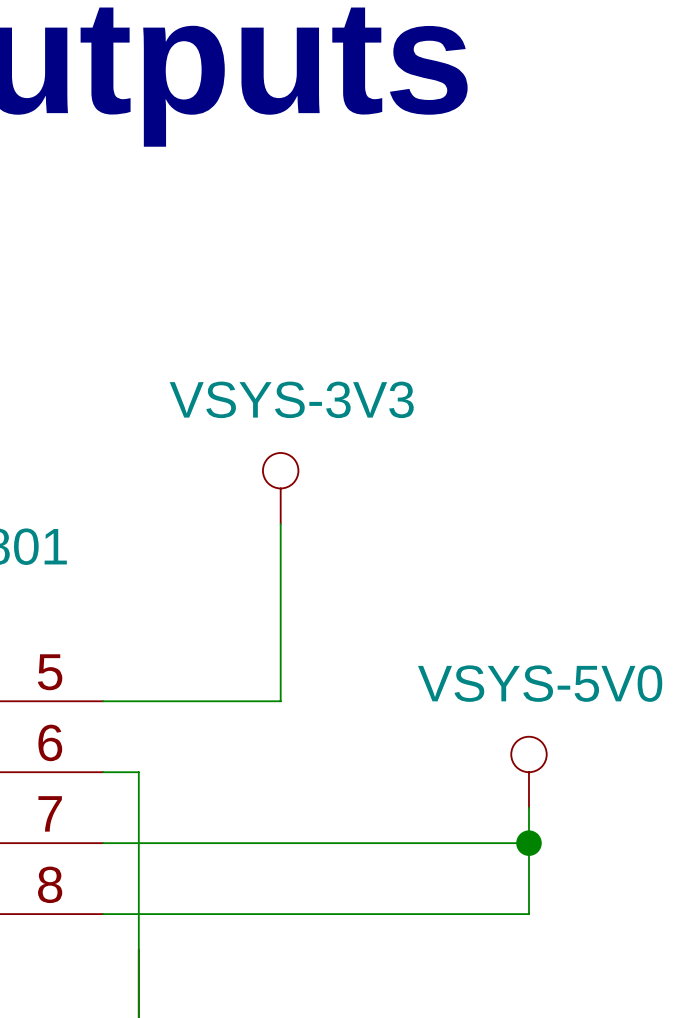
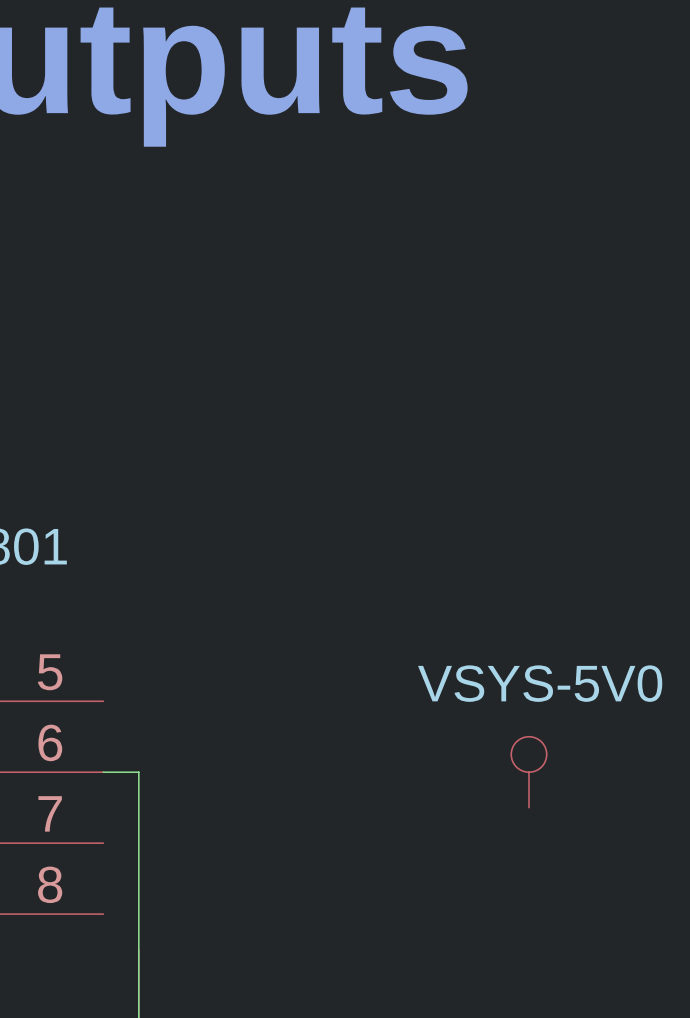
power symbol: VSYS-3V3 (280, 488) -> none
wire: (280, 523) (280, 701) (103, 701) -> none
wire: (528, 807) (528, 914) (103, 914) -> none
wire: (103, 843) (528, 843) -> none
junction: (528, 843) -> none

